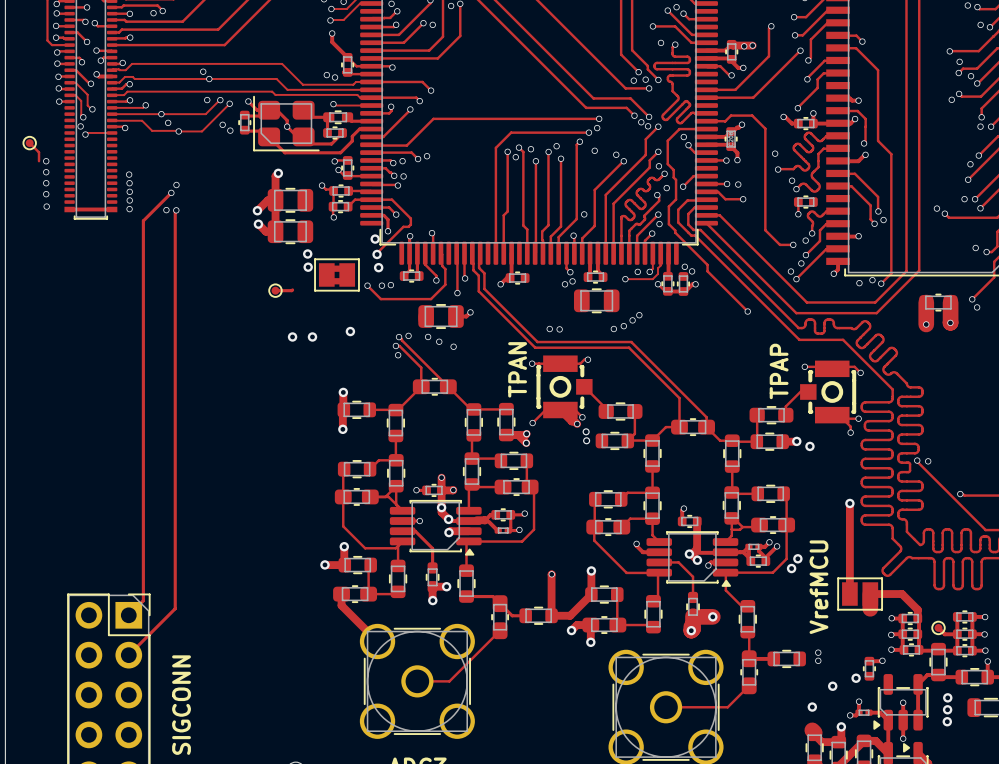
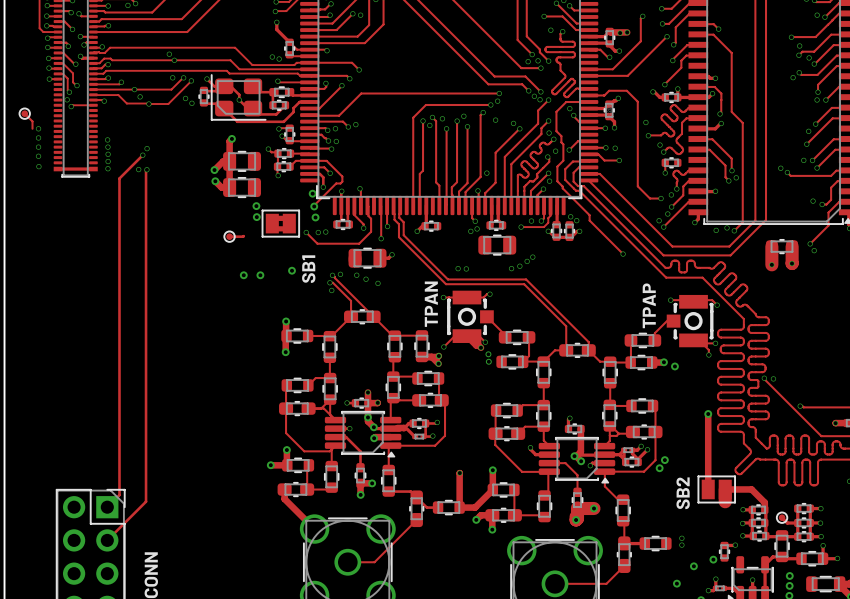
text: none -> SB1 (308, 269)
text: VrefMCU (818, 587) -> none
text: none -> SB2 (683, 493)

